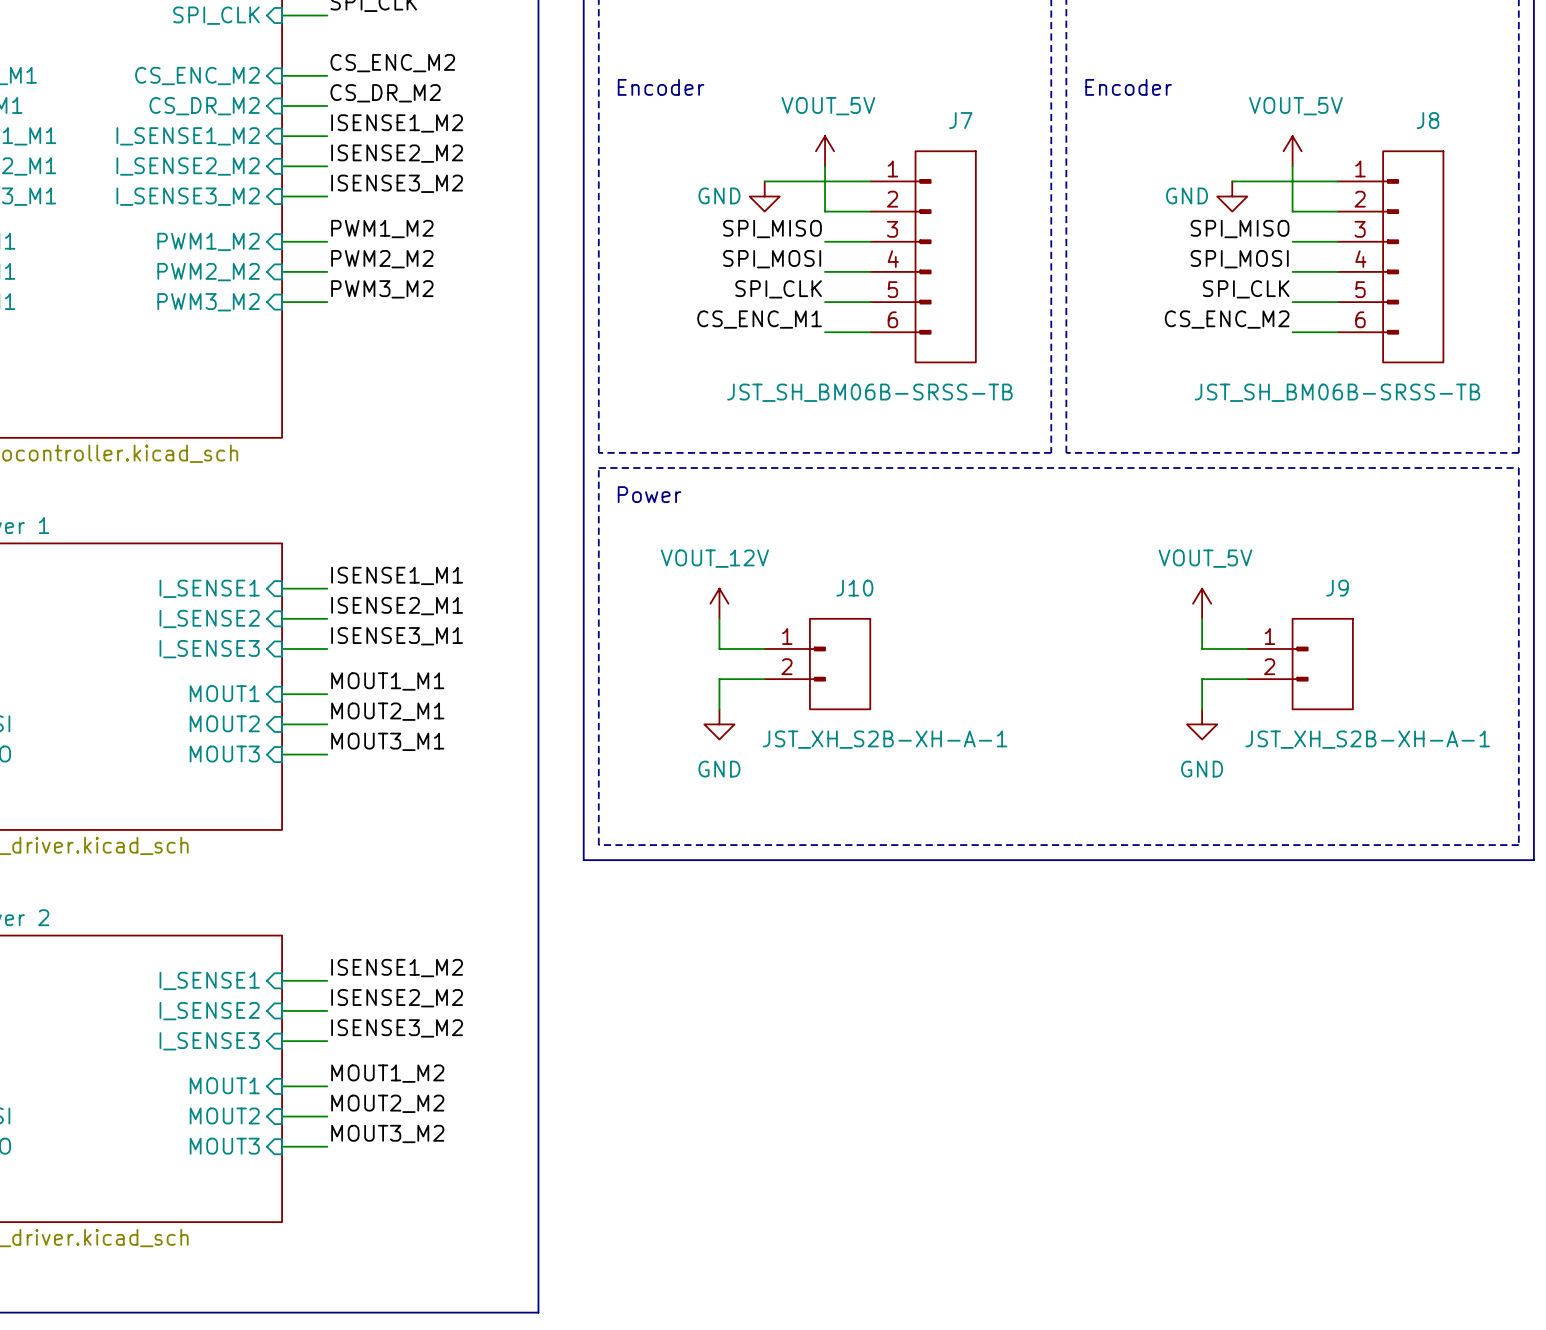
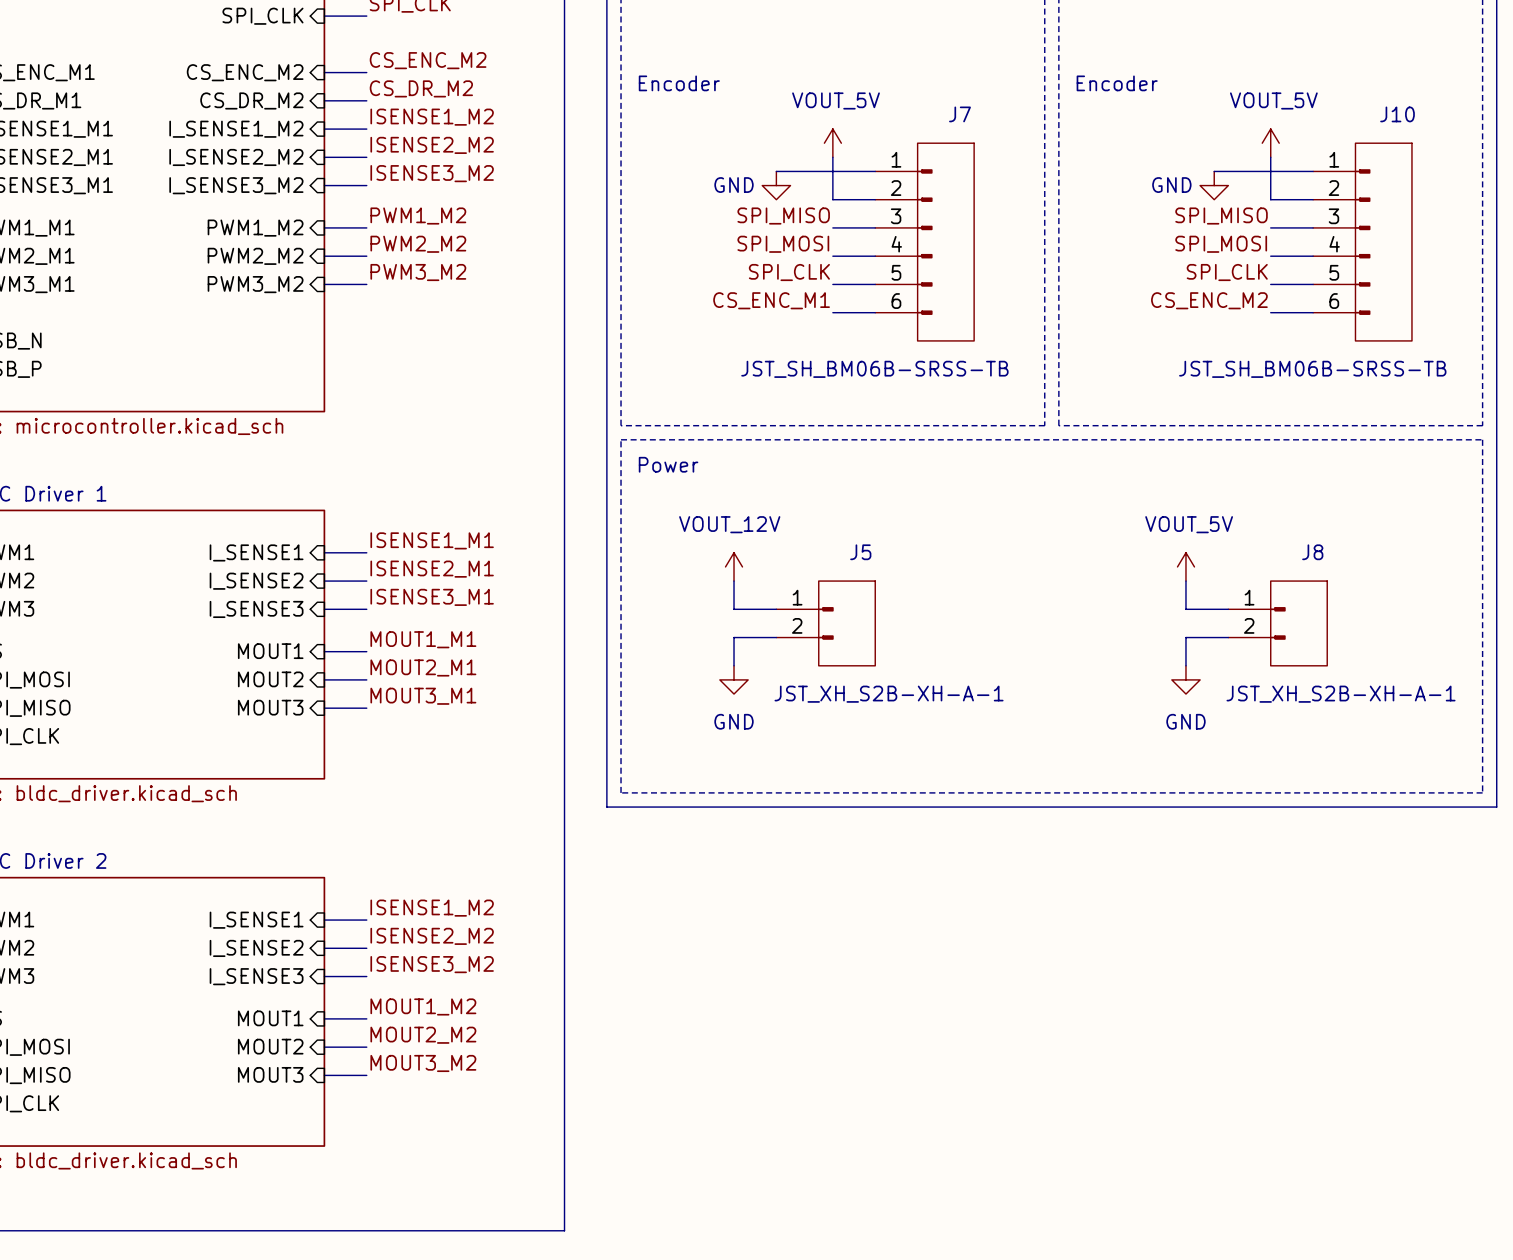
J8 name: J8 (1427, 120) -> J10 (1397, 114)
J10 name: J10 (854, 588) -> J5 (860, 552)
J9 name: J9 (1337, 588) -> J8 (1312, 552)

